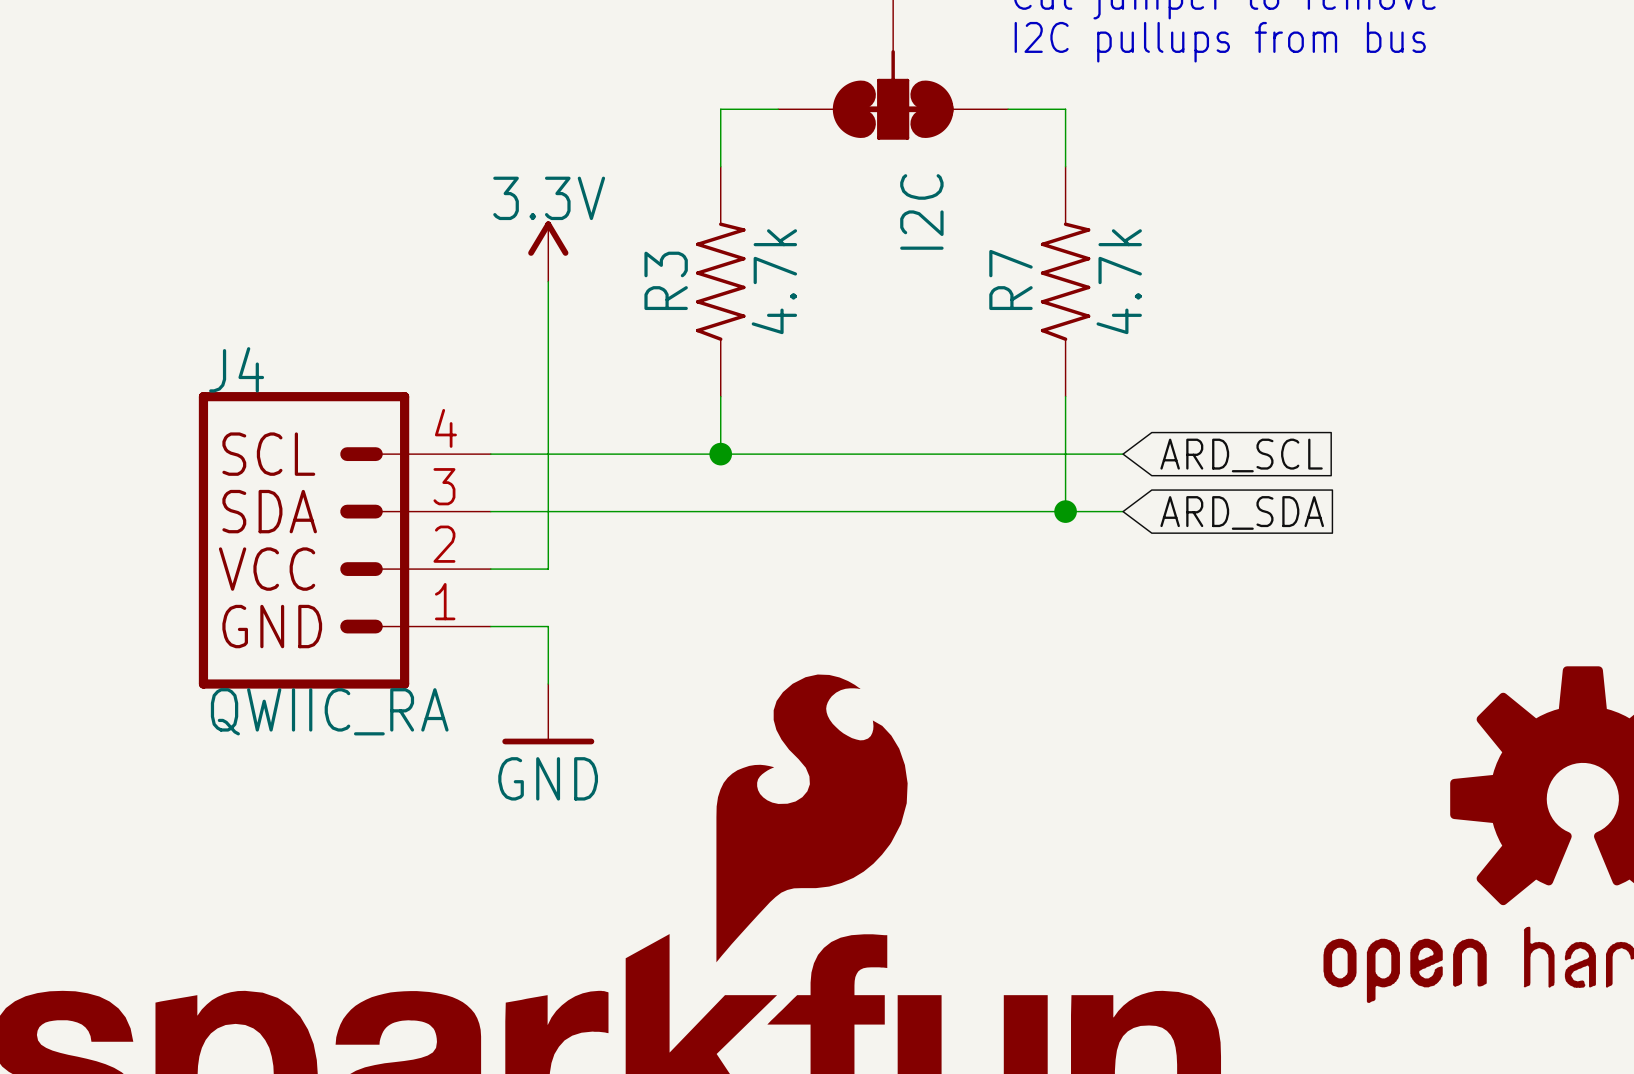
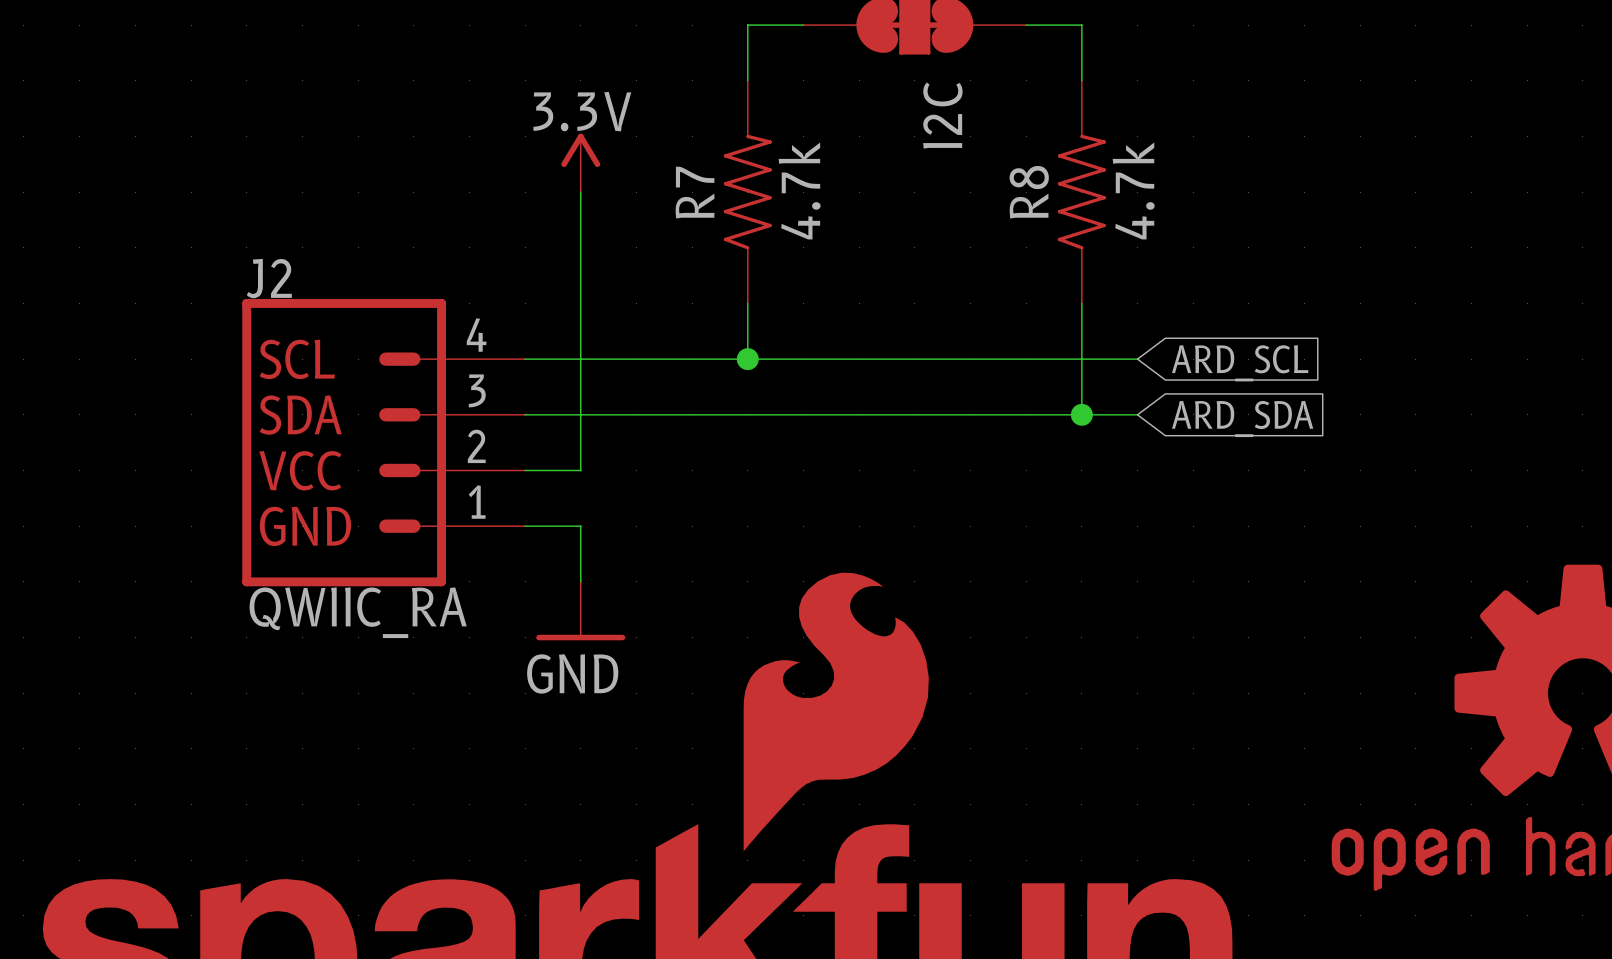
R7 name: R7 (1010, 279) -> R8 (1029, 192)
R3 name: R3 (666, 280) -> R7 (695, 192)
J4 name: J4 (236, 369) -> J2 (269, 278)

